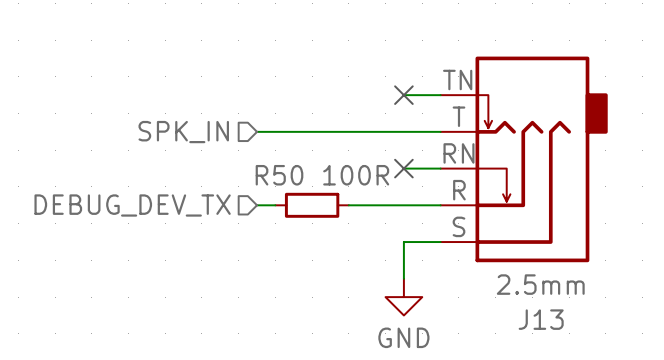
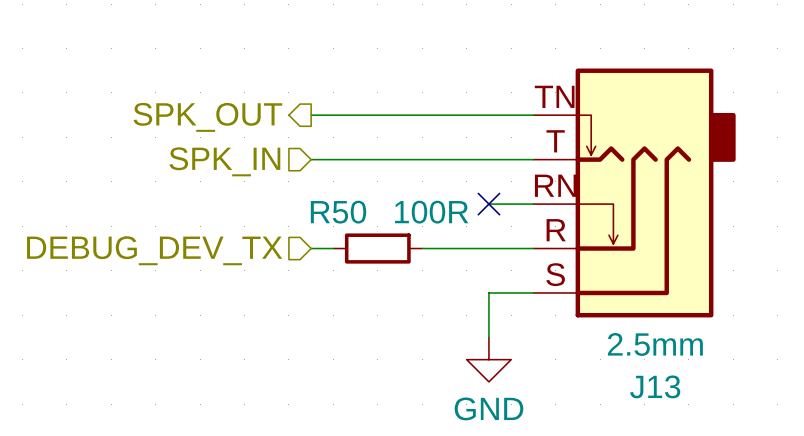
hierarchical label: none -> SPK_OUT (207, 117)
wire: none -> (311, 115) (488, 115)
no-connect mark: (403, 95) -> none

